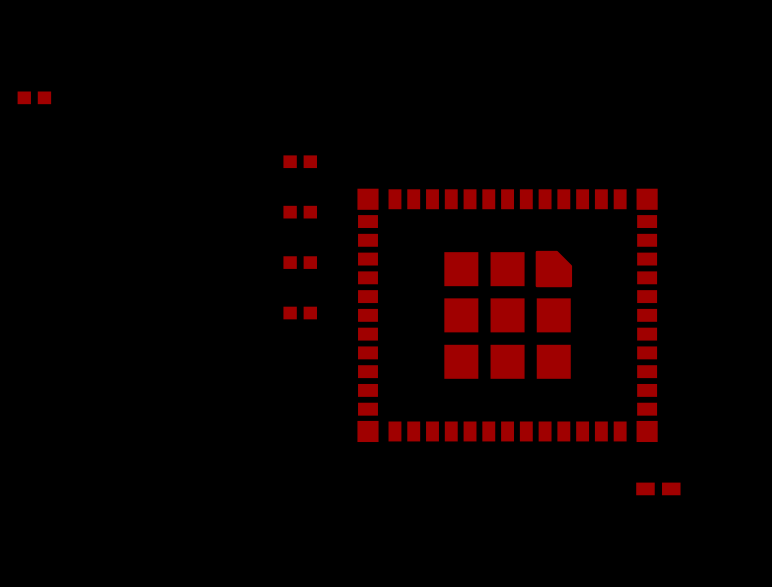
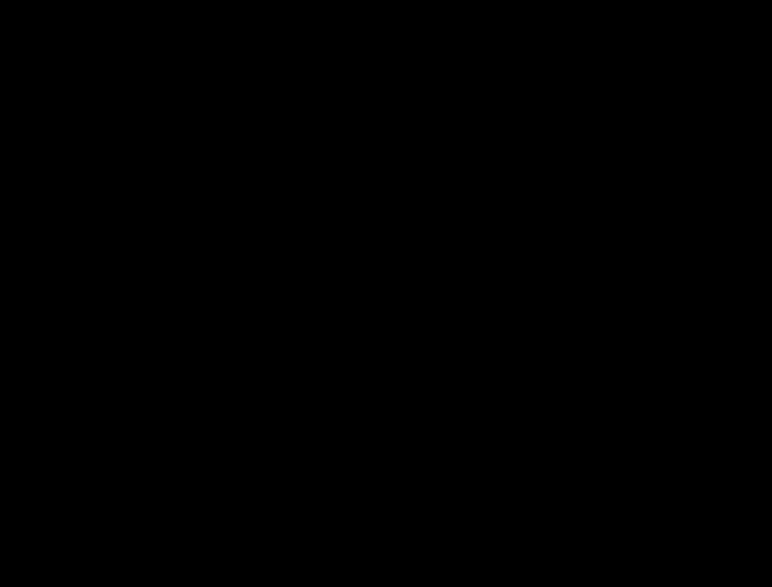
part: (34, 97) -> none
part: (300, 161) -> none
part: (300, 212) -> none
part: (300, 262) -> none
part: (300, 313) -> none
part: (507, 315) -> none
part: (658, 488) -> none

